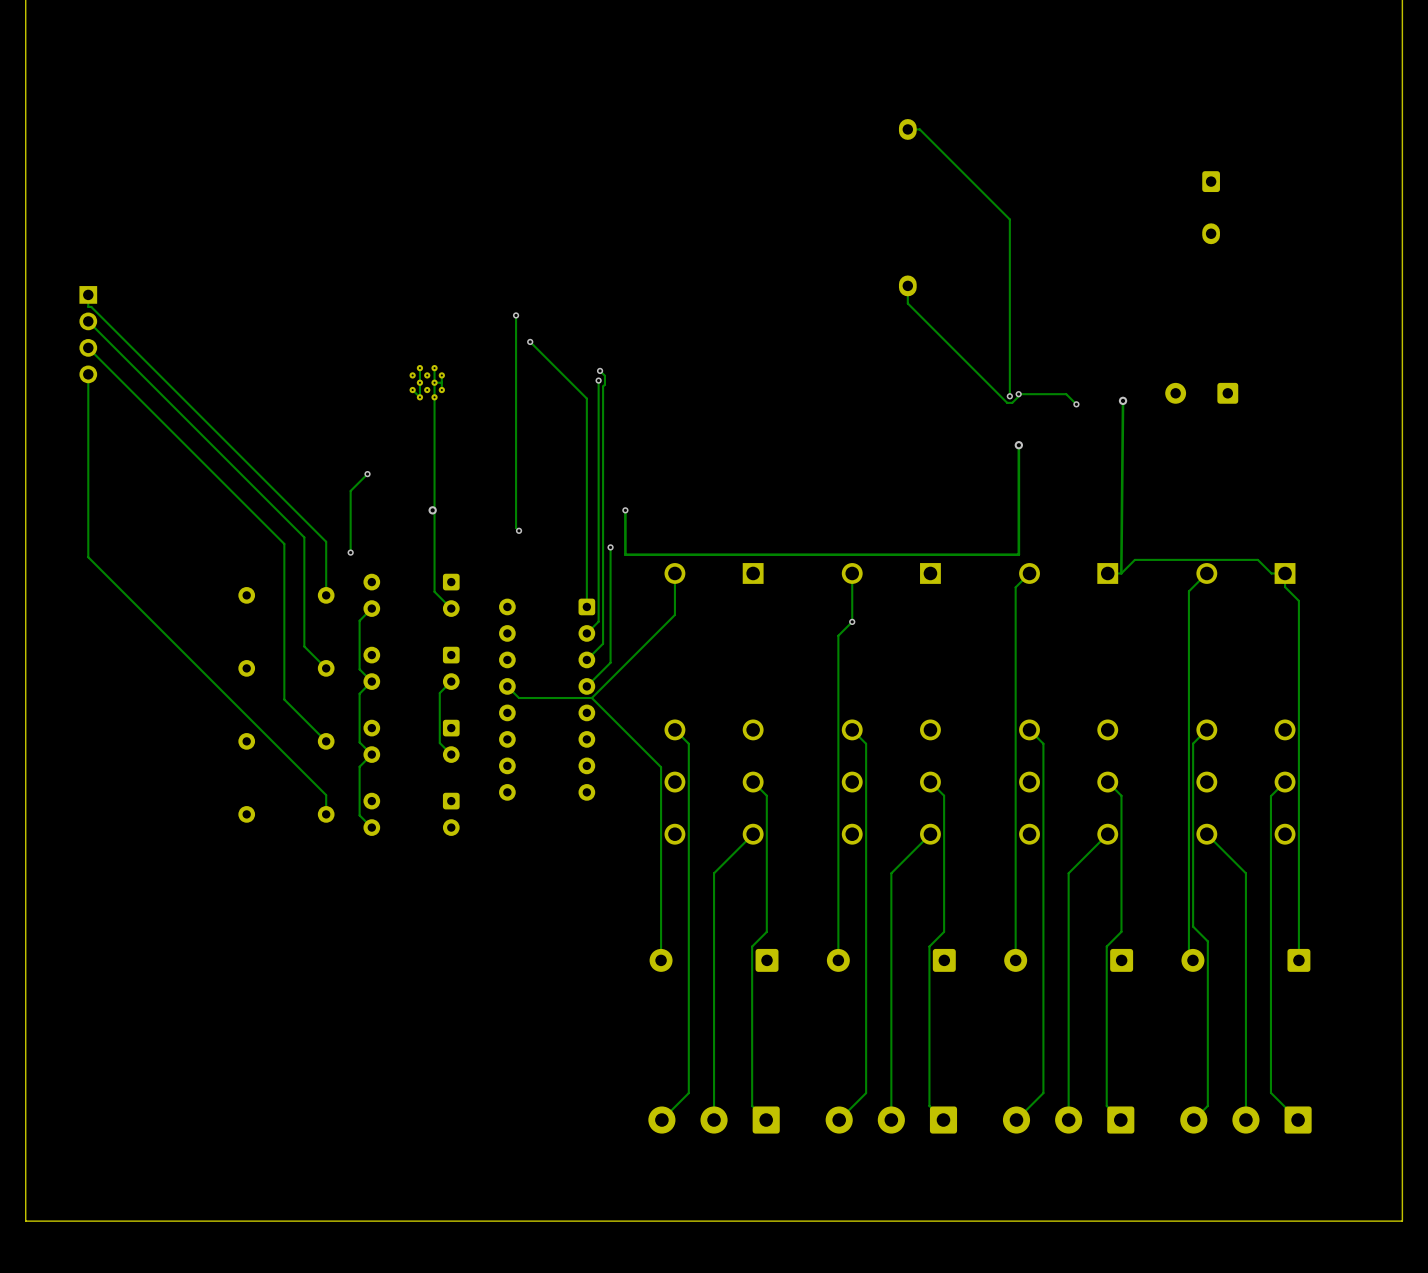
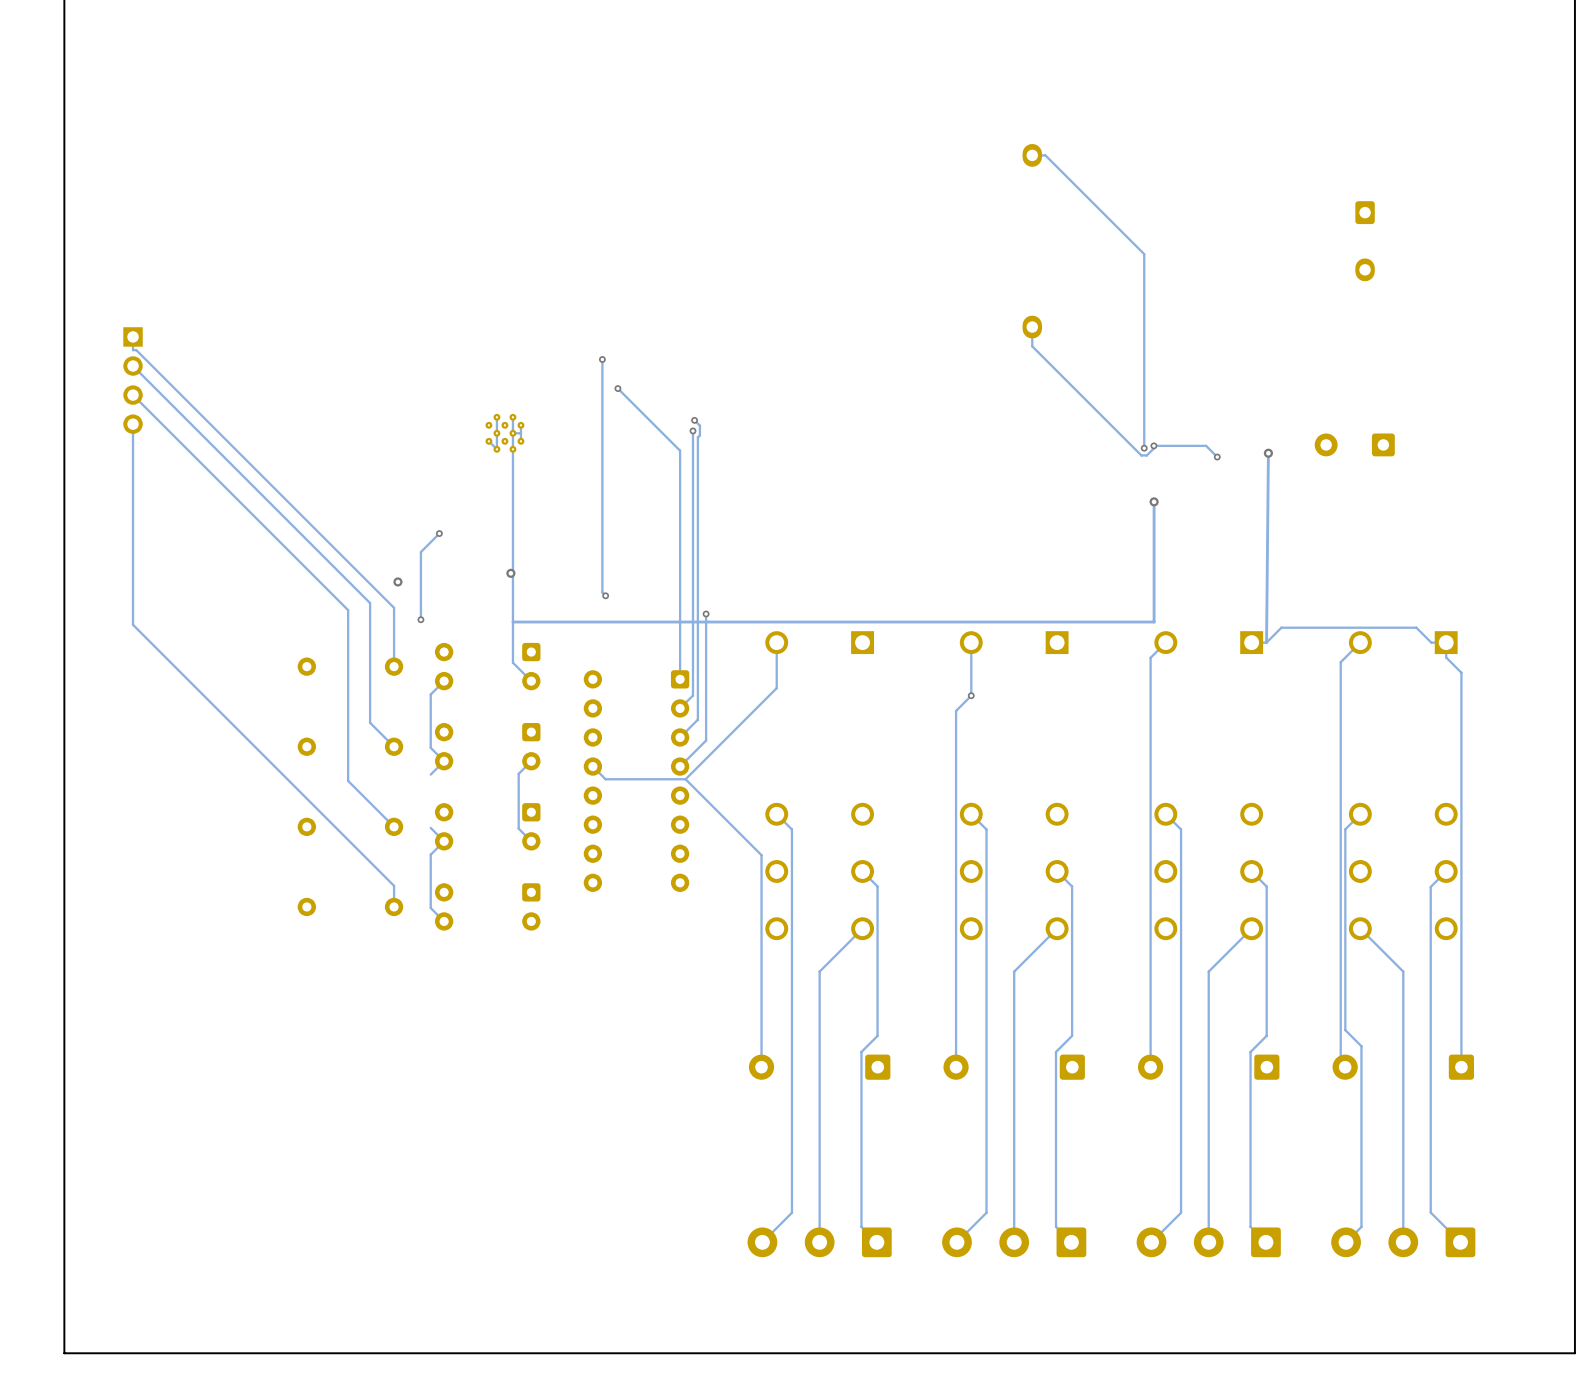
track: (625, 510) (625, 554) -> (512, 622) (722, 622)
via: (625, 510) -> none
via: none -> (397, 581)
track: (359, 693) (359, 742) -> none

